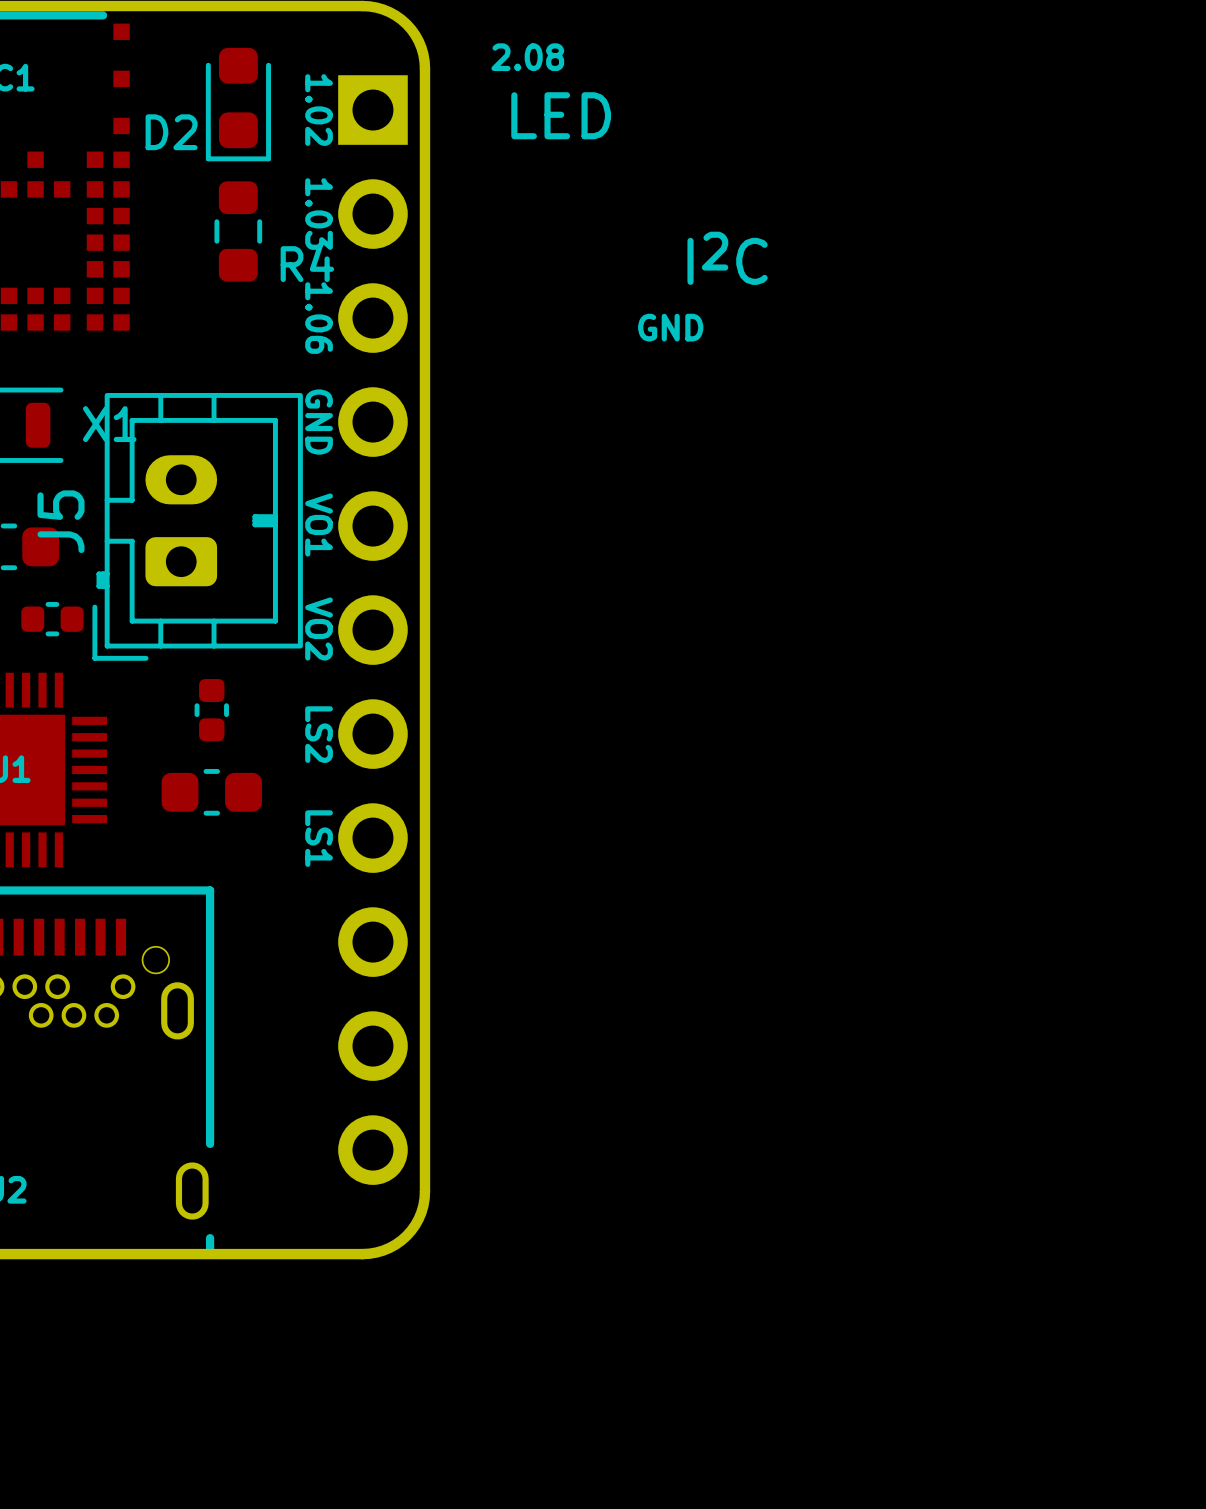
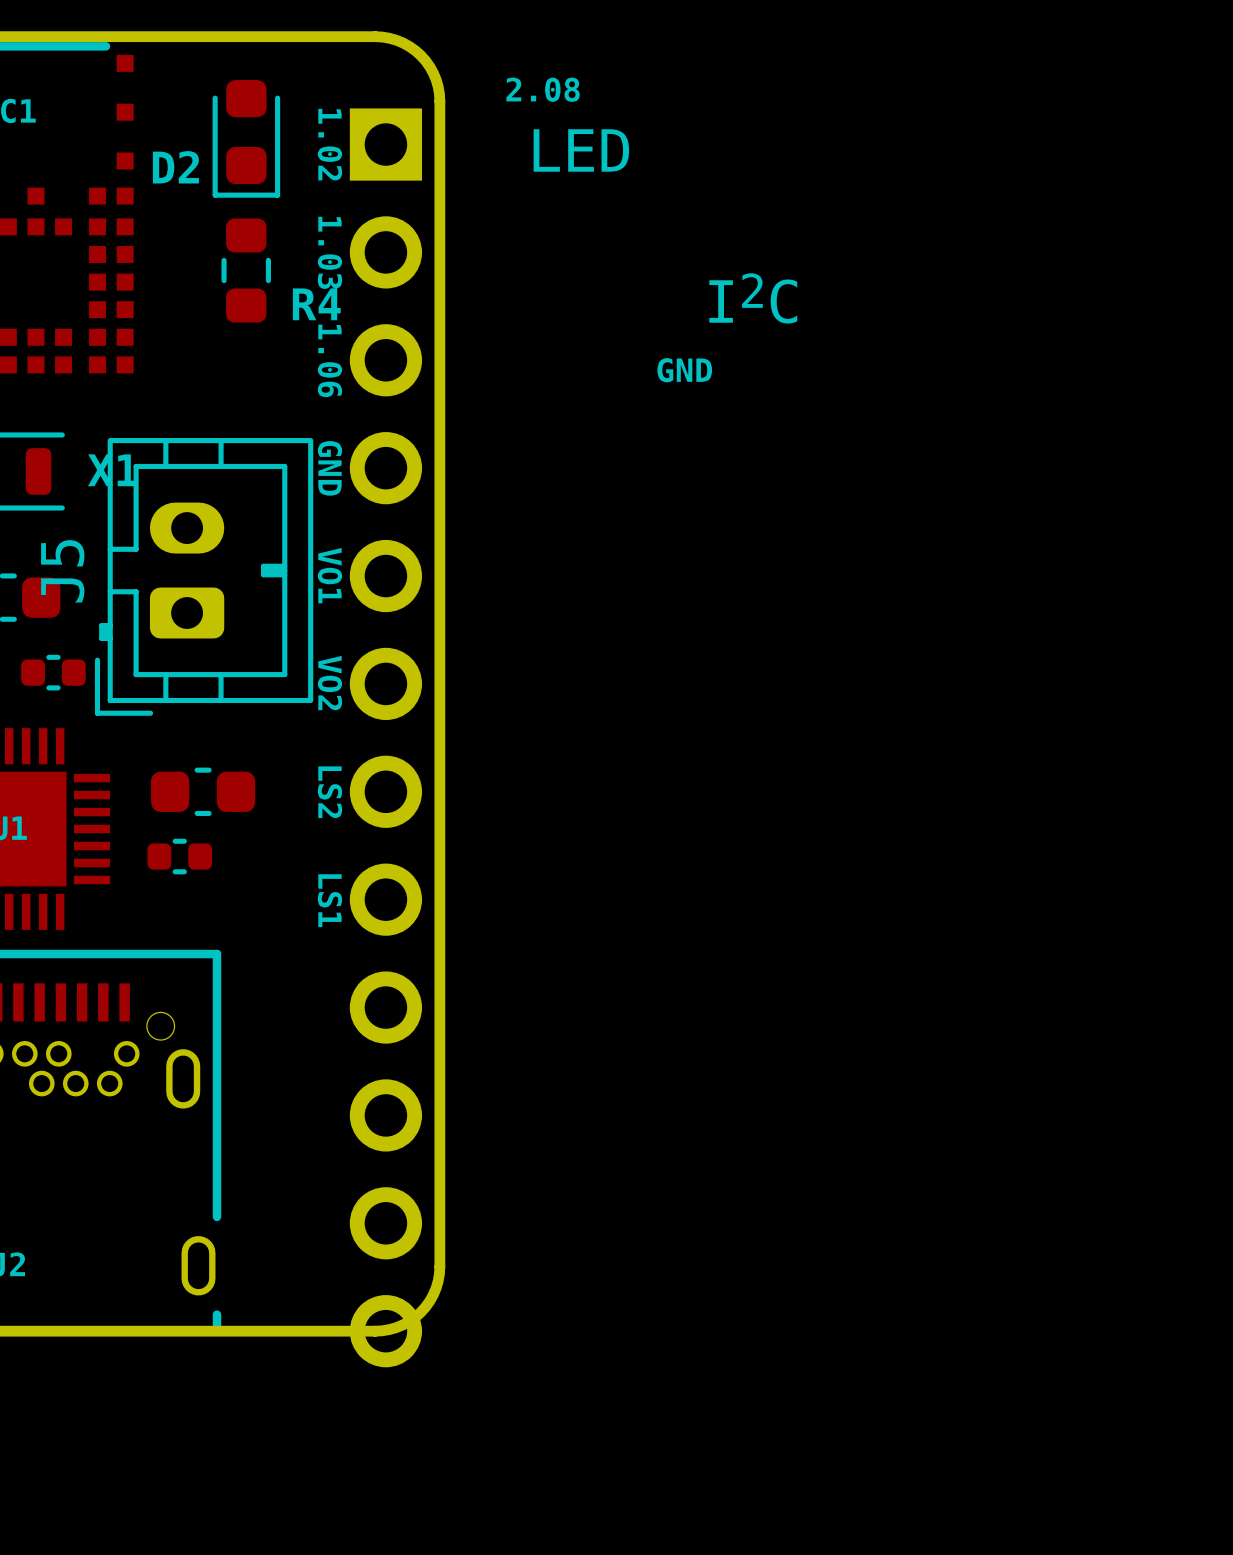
part footprint: [194, 679, 229, 742] -> [151, 767, 256, 817]
part: none -> (385, 737)
part: (211, 792) -> none
part: none -> (179, 856)

